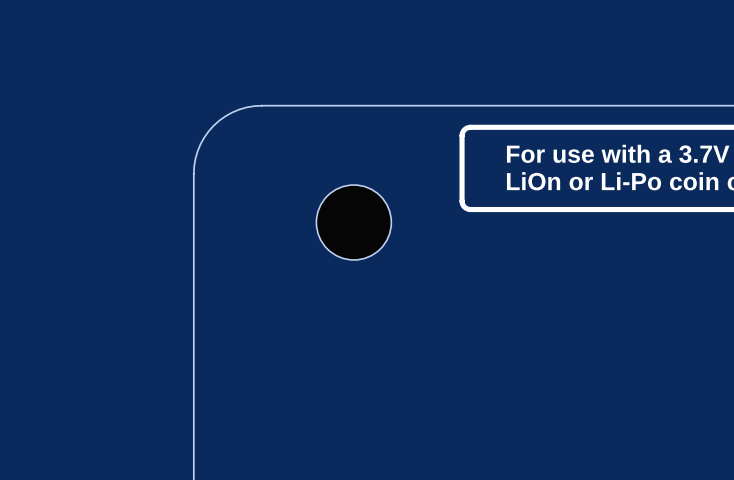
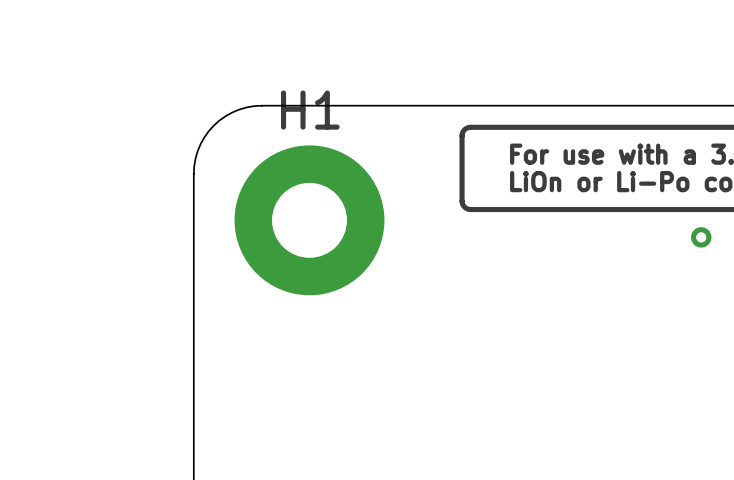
H1: none -> (309, 220)
part: (353, 222) -> none
via: none -> (701, 237)

